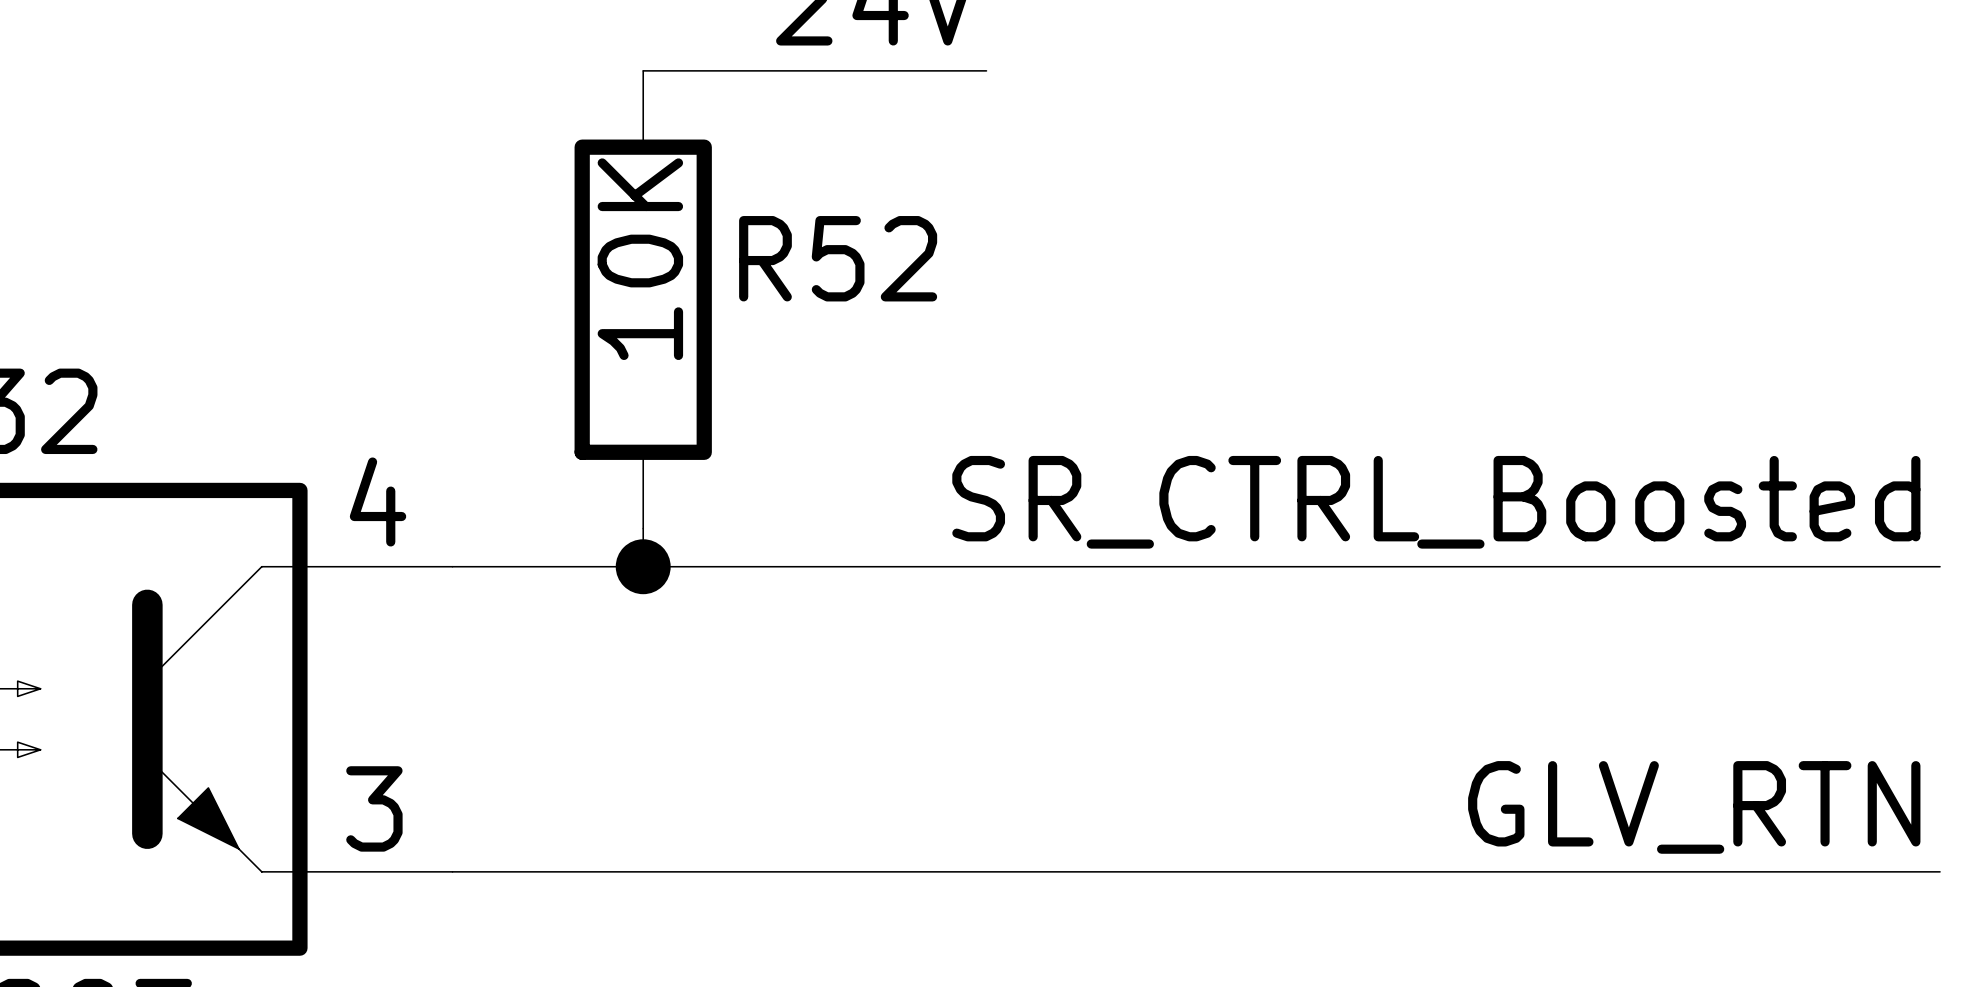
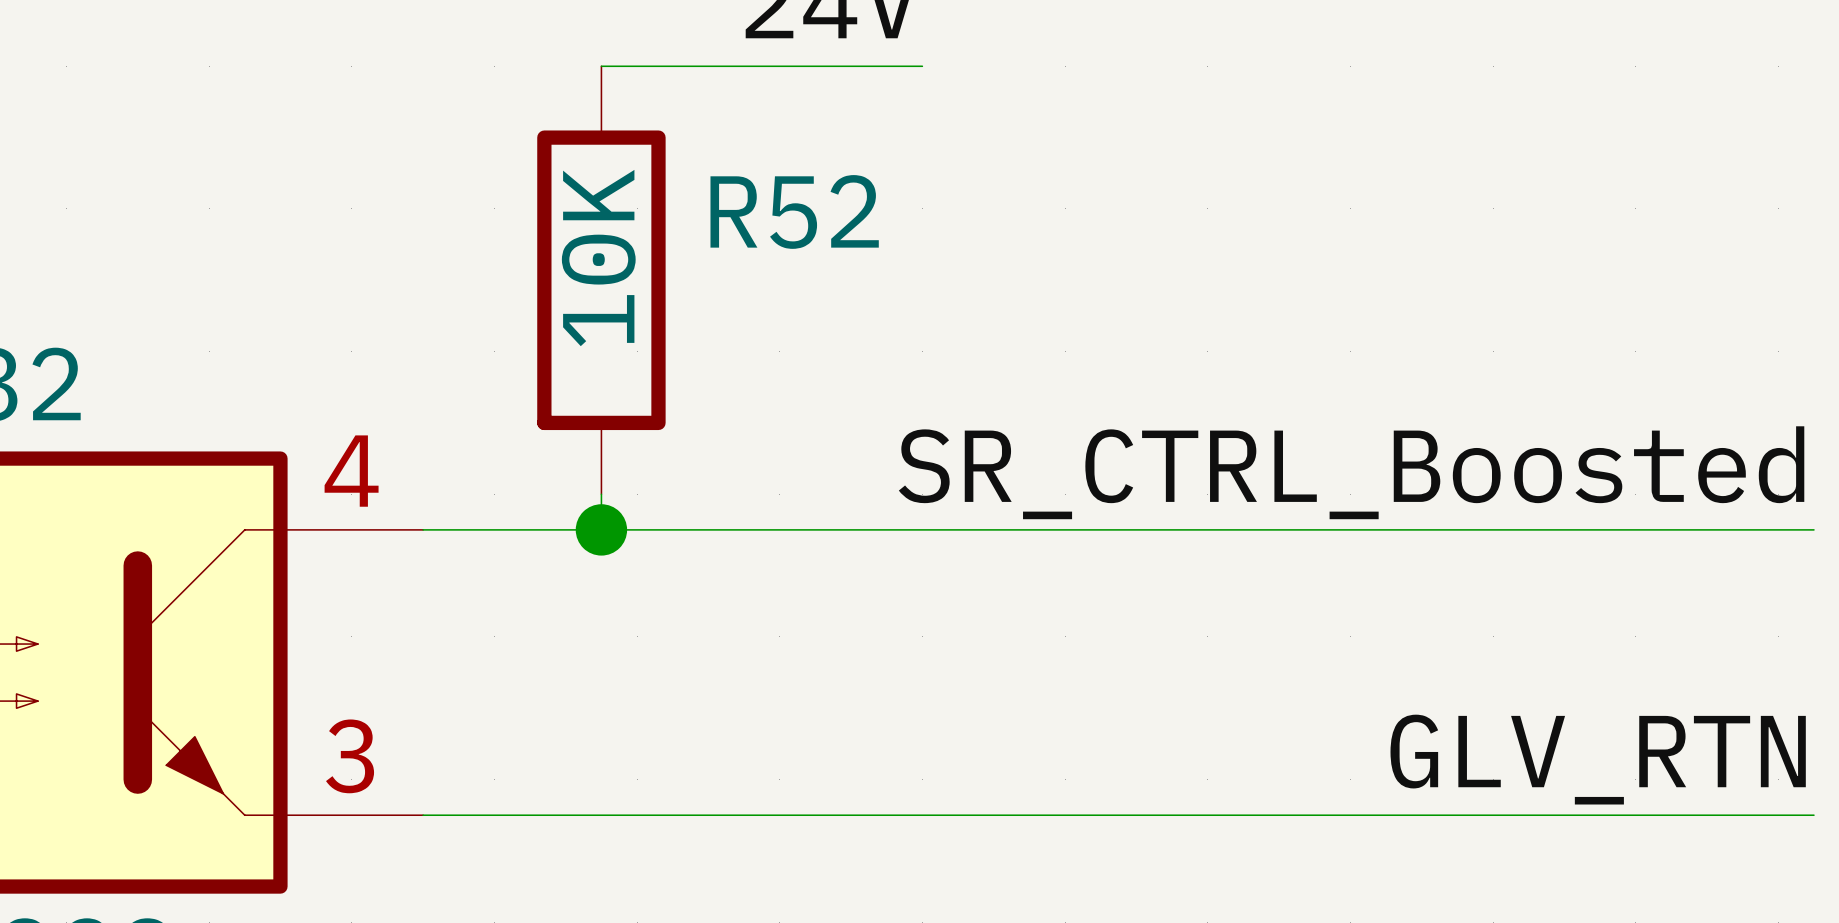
R52 name position: R52 (838, 258) -> R52 (794, 211)

